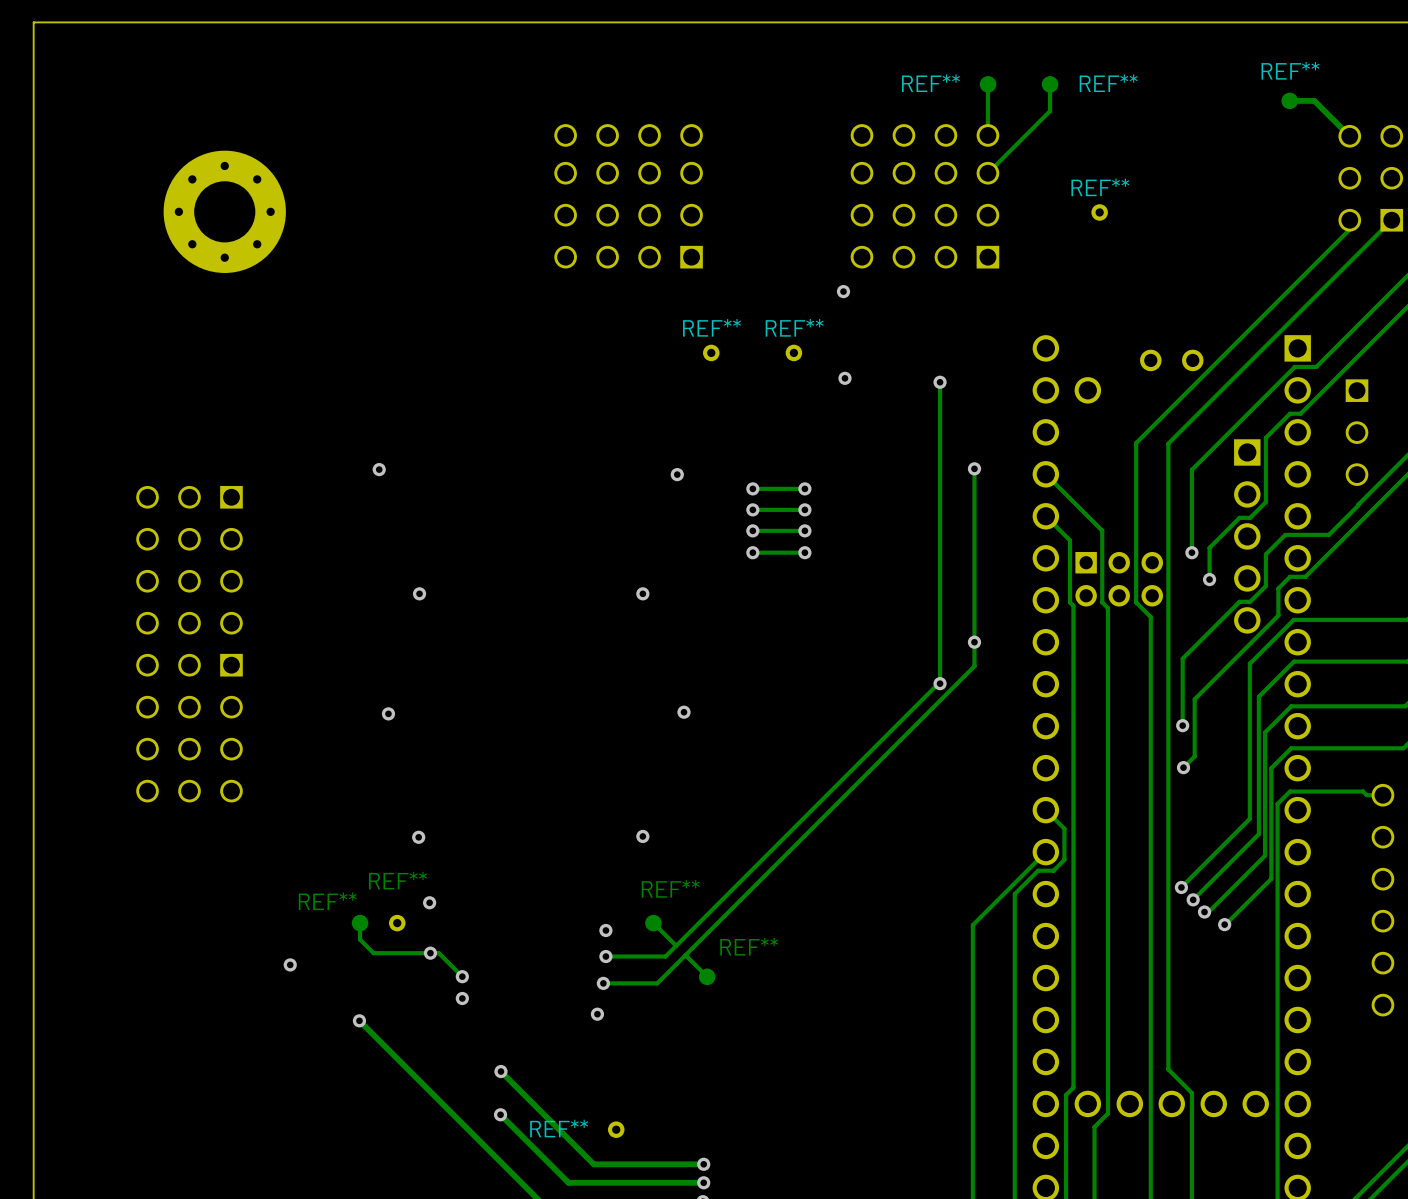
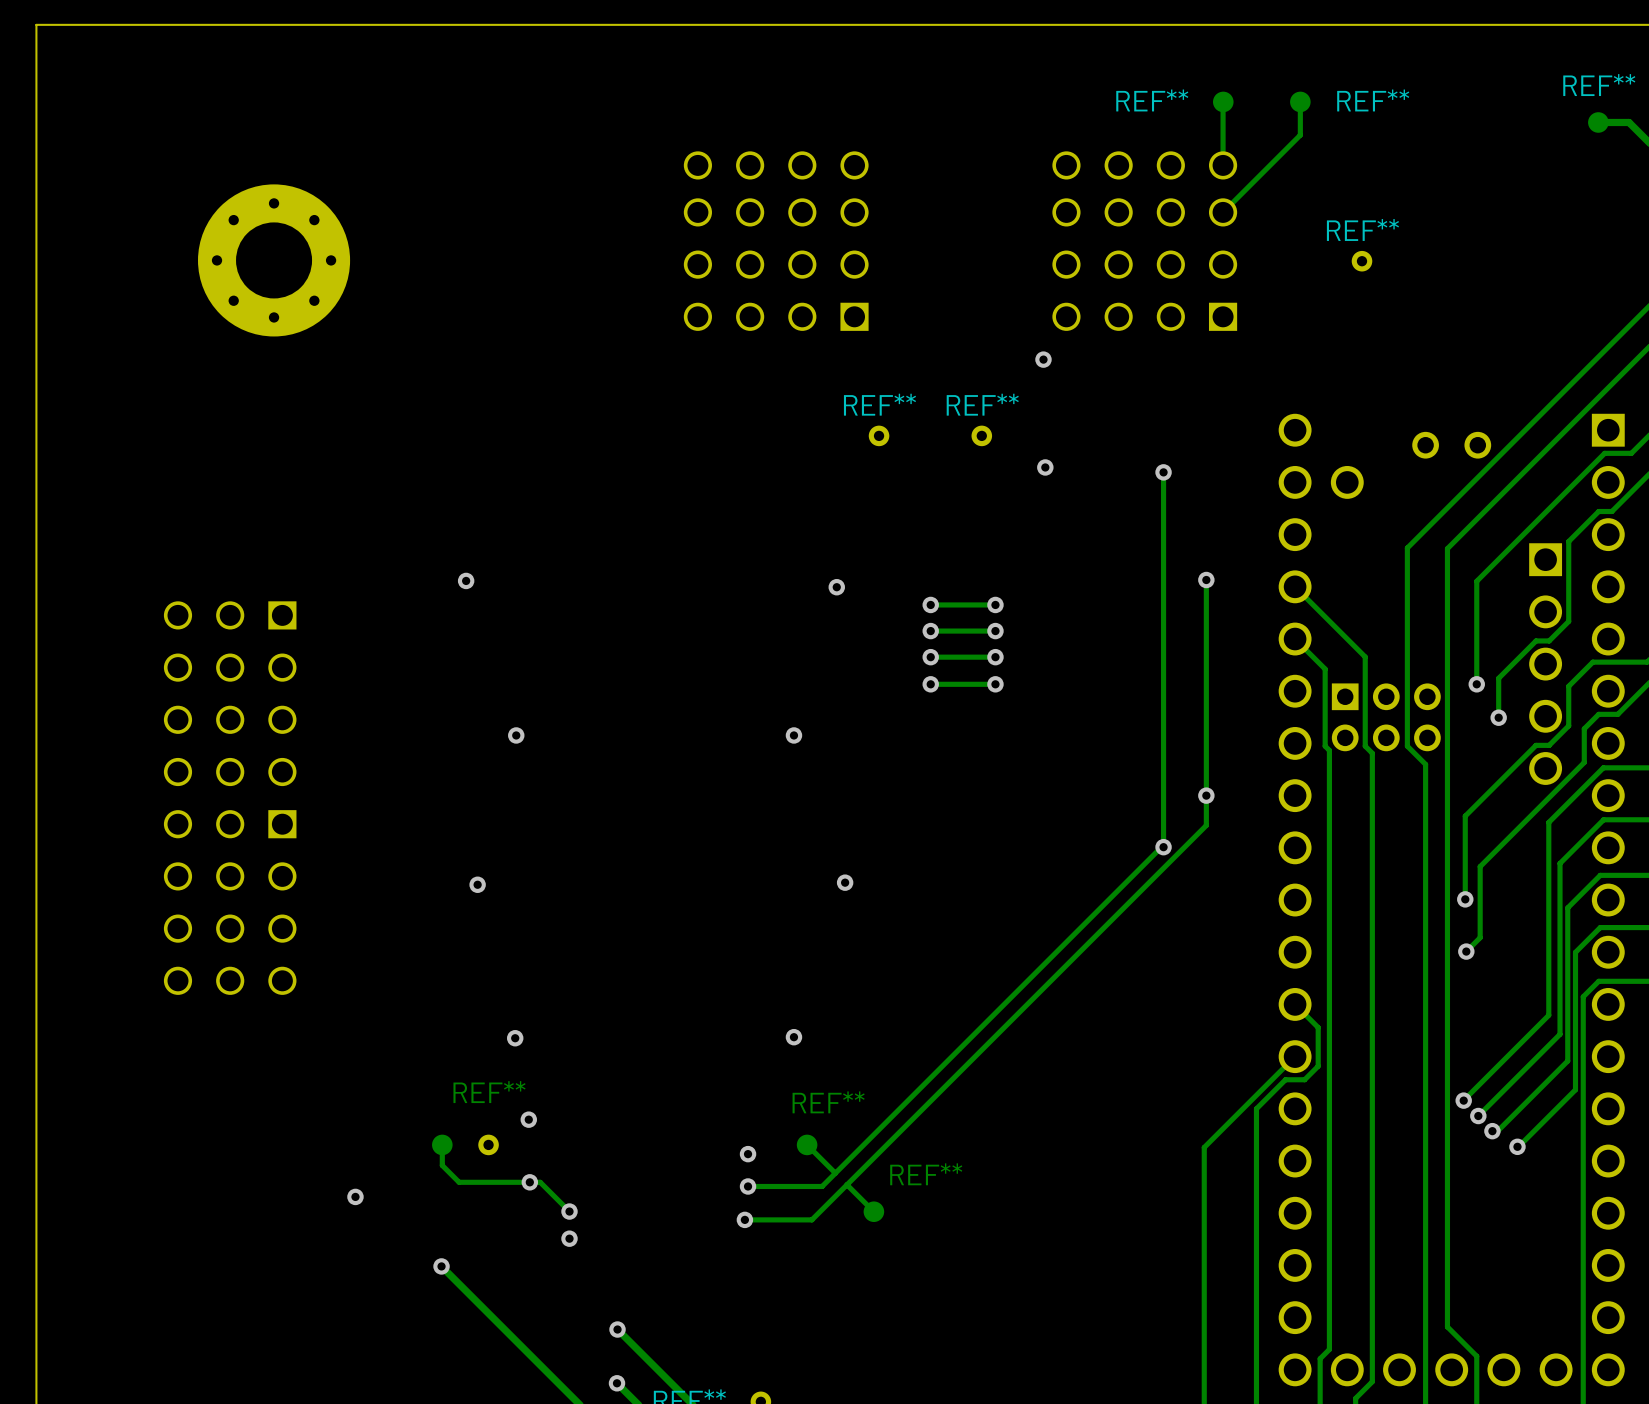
REF** name: REF** (327, 901) -> none
via: (597, 1014) -> none

